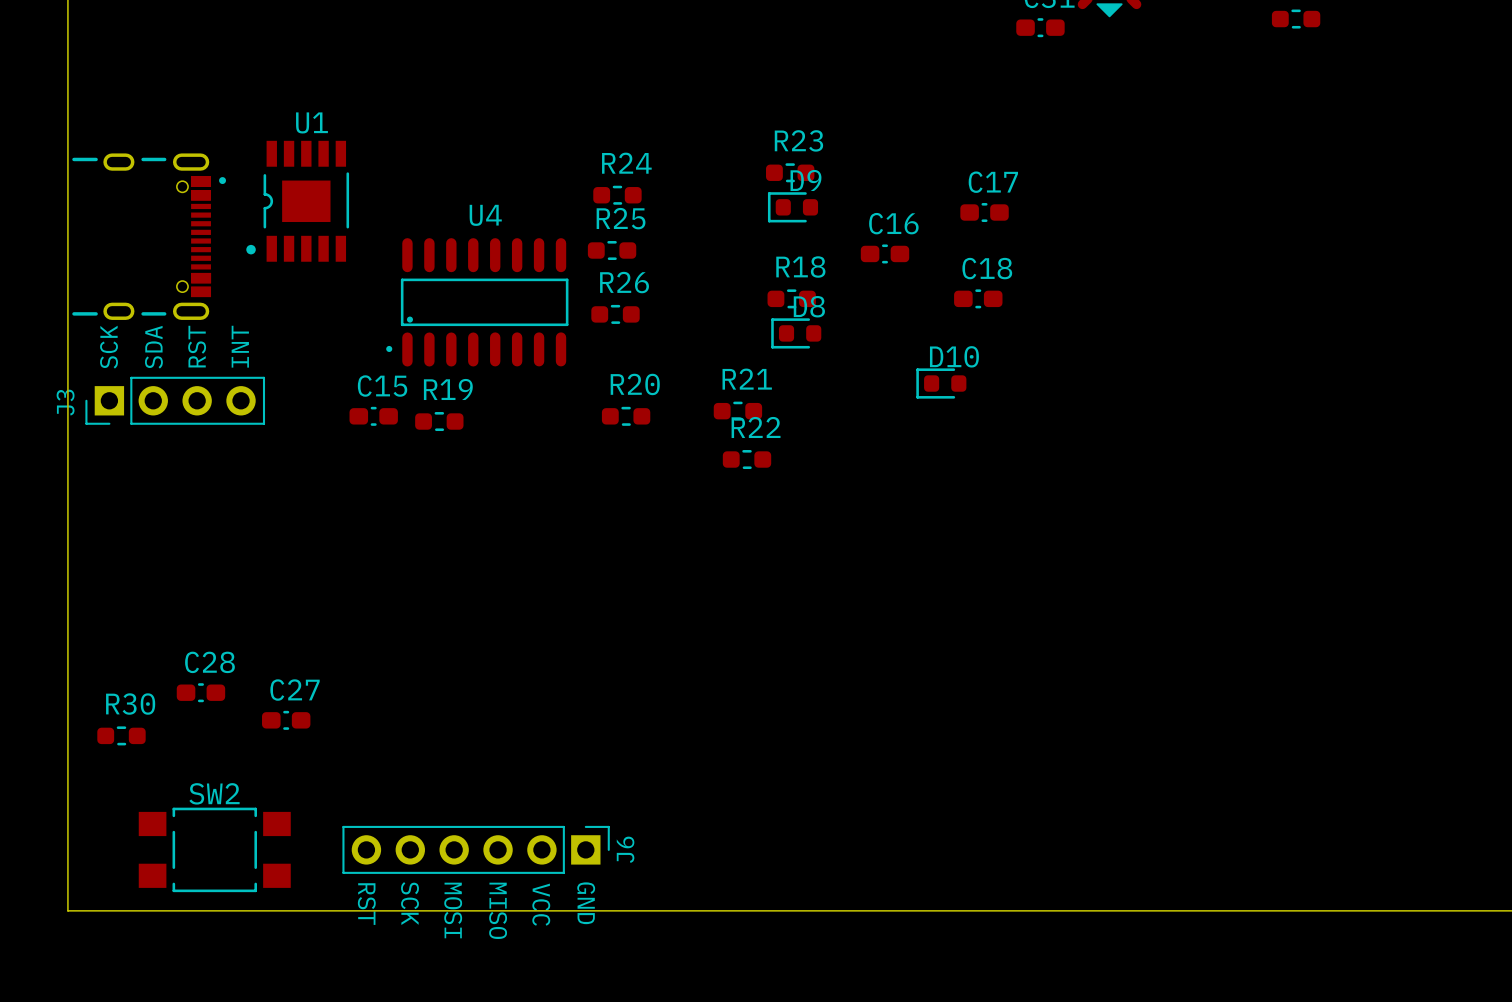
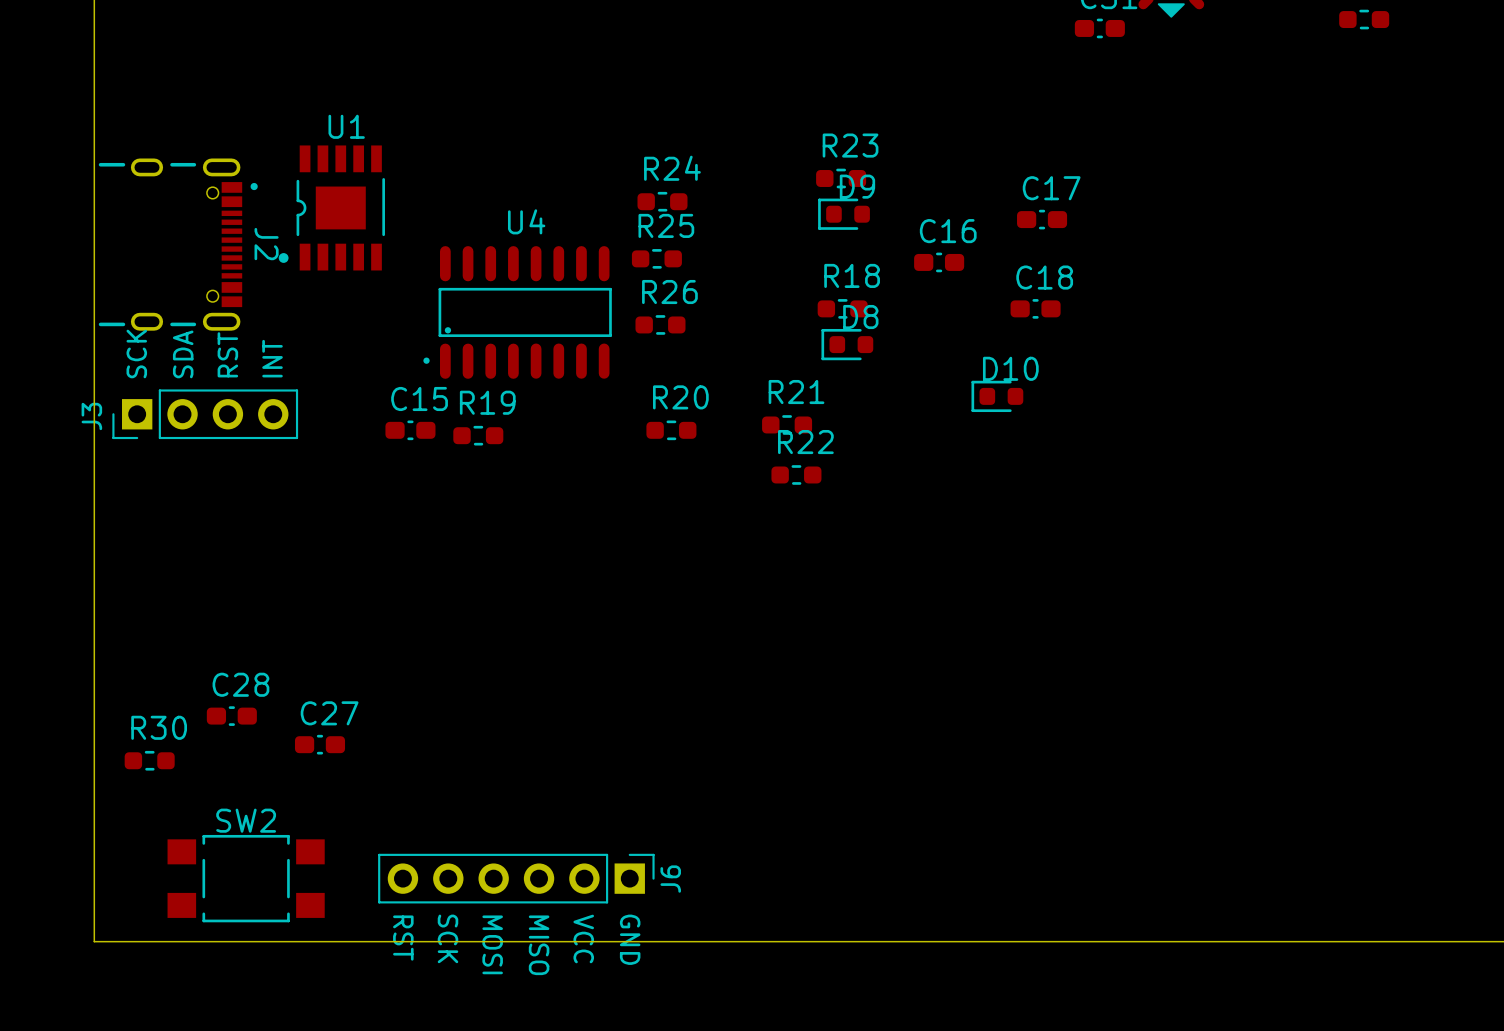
part: (149, 236) -> none
J2: none -> (178, 244)

